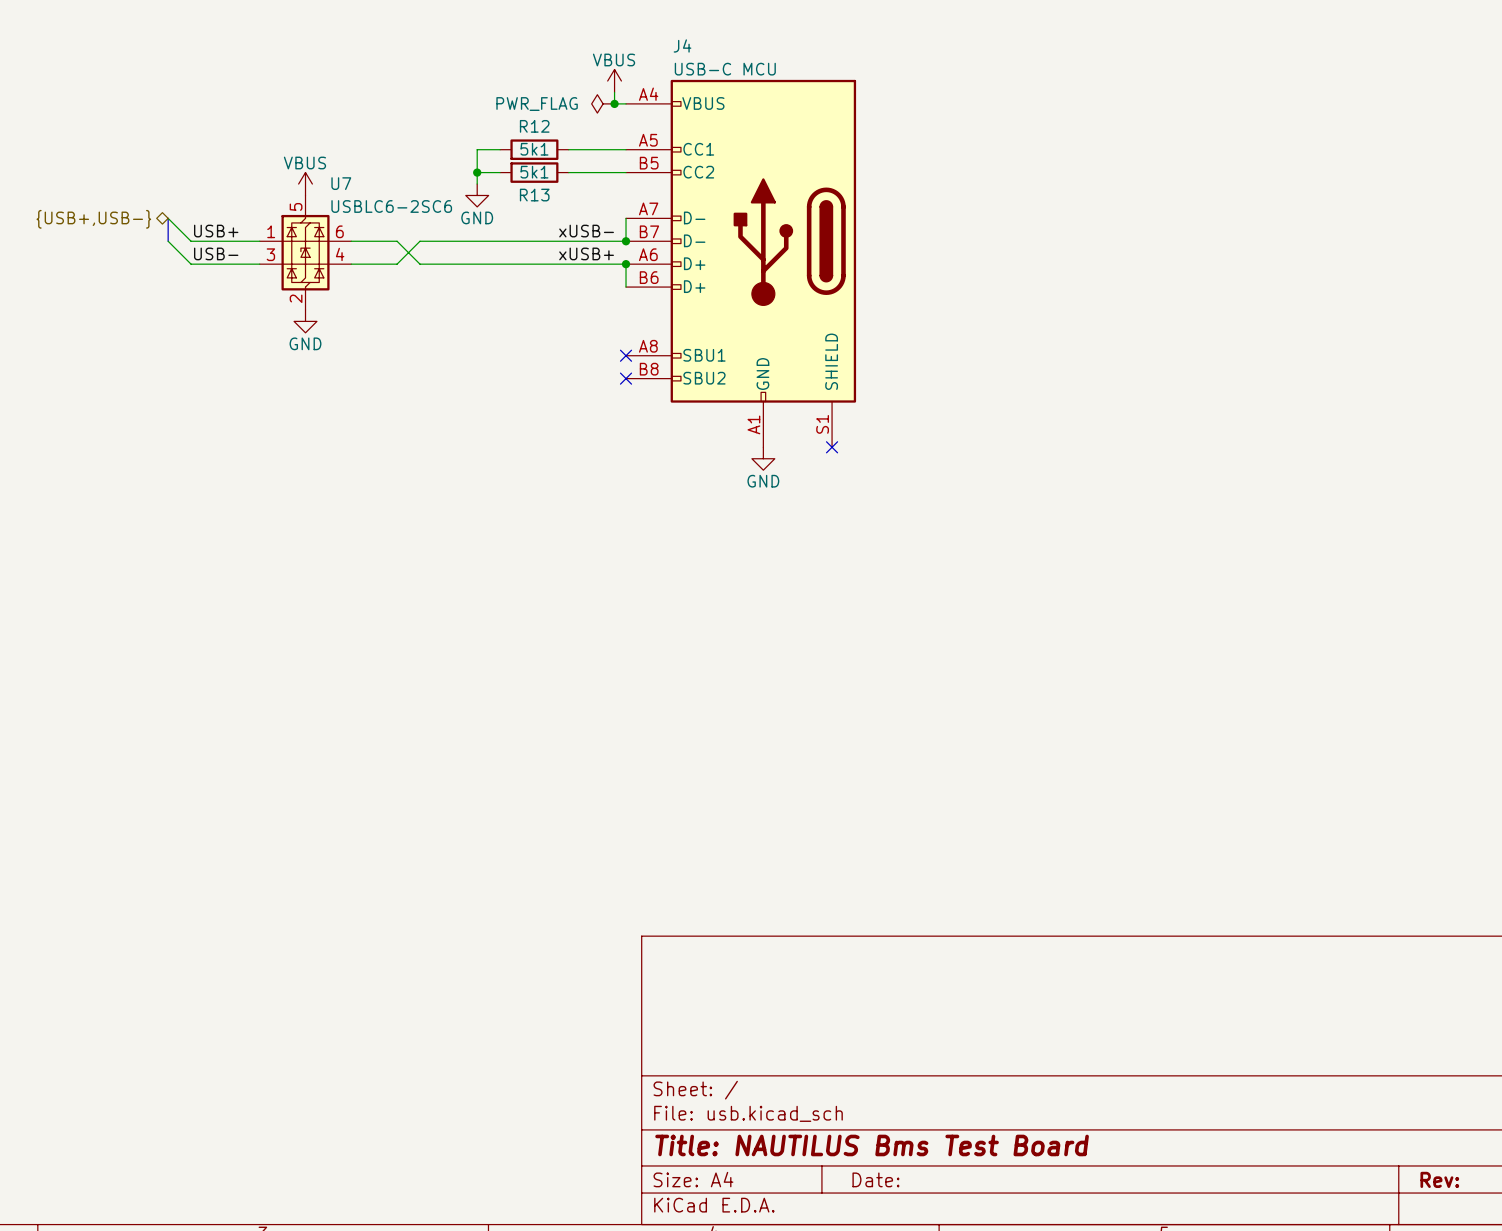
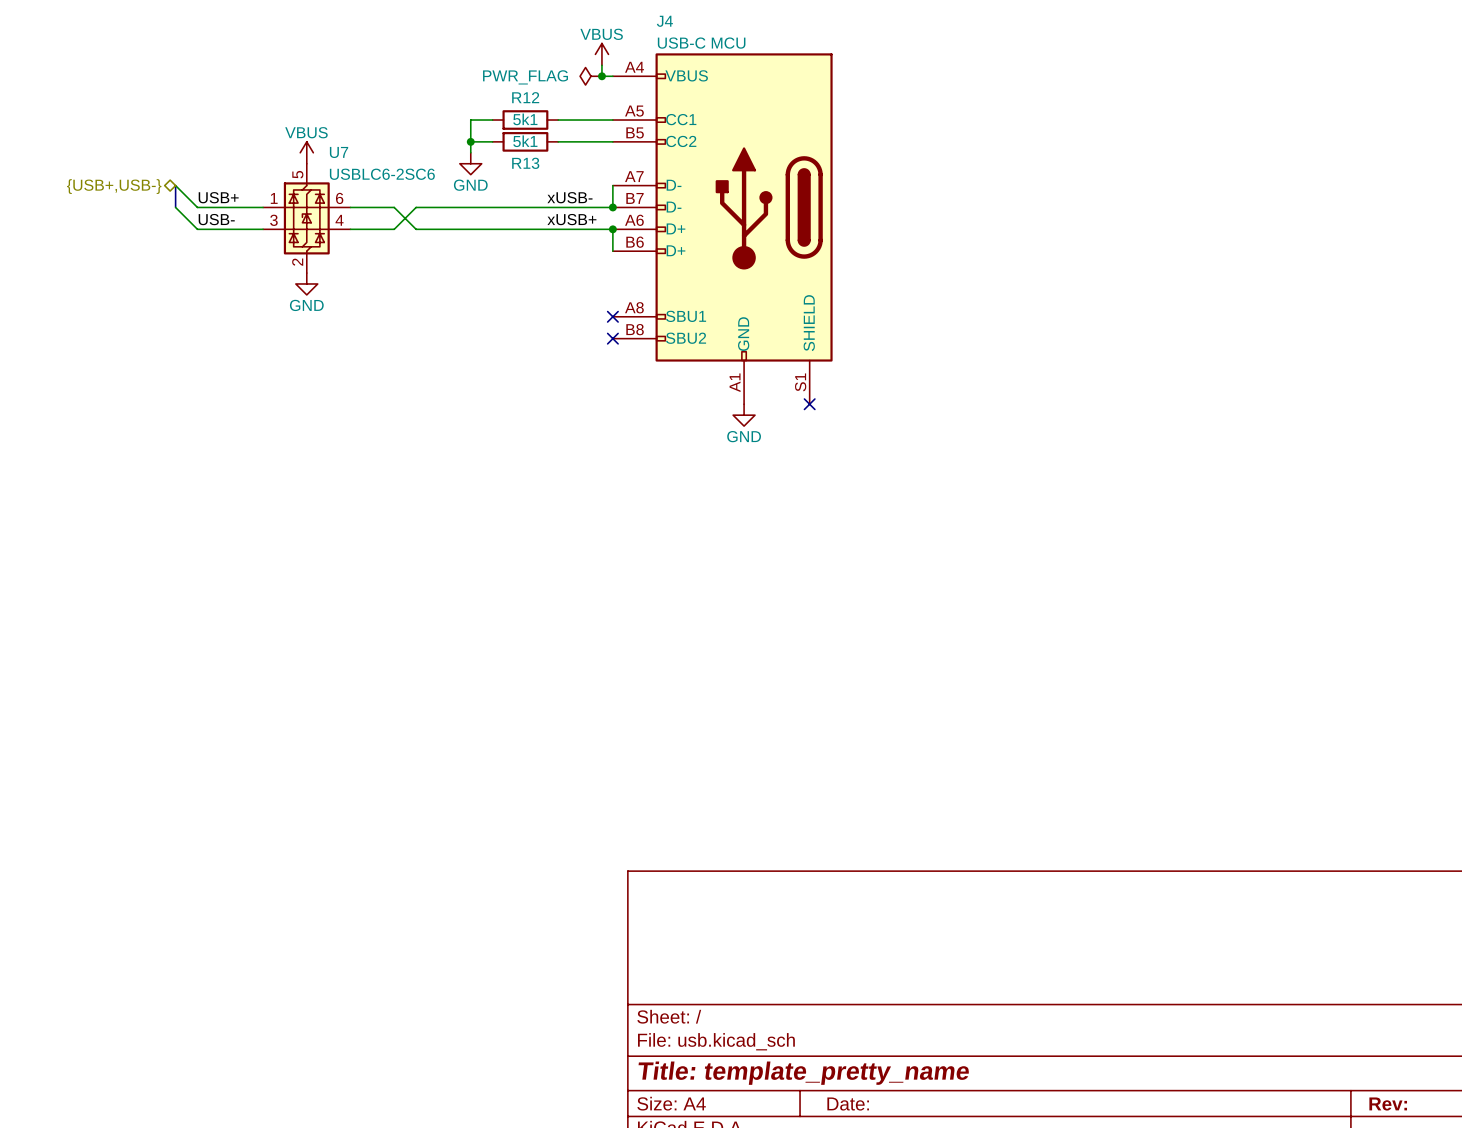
title block: Title: NAUTILUS Bms Test Board (872, 1145) -> Title: template_pretty_name (803, 1073)

